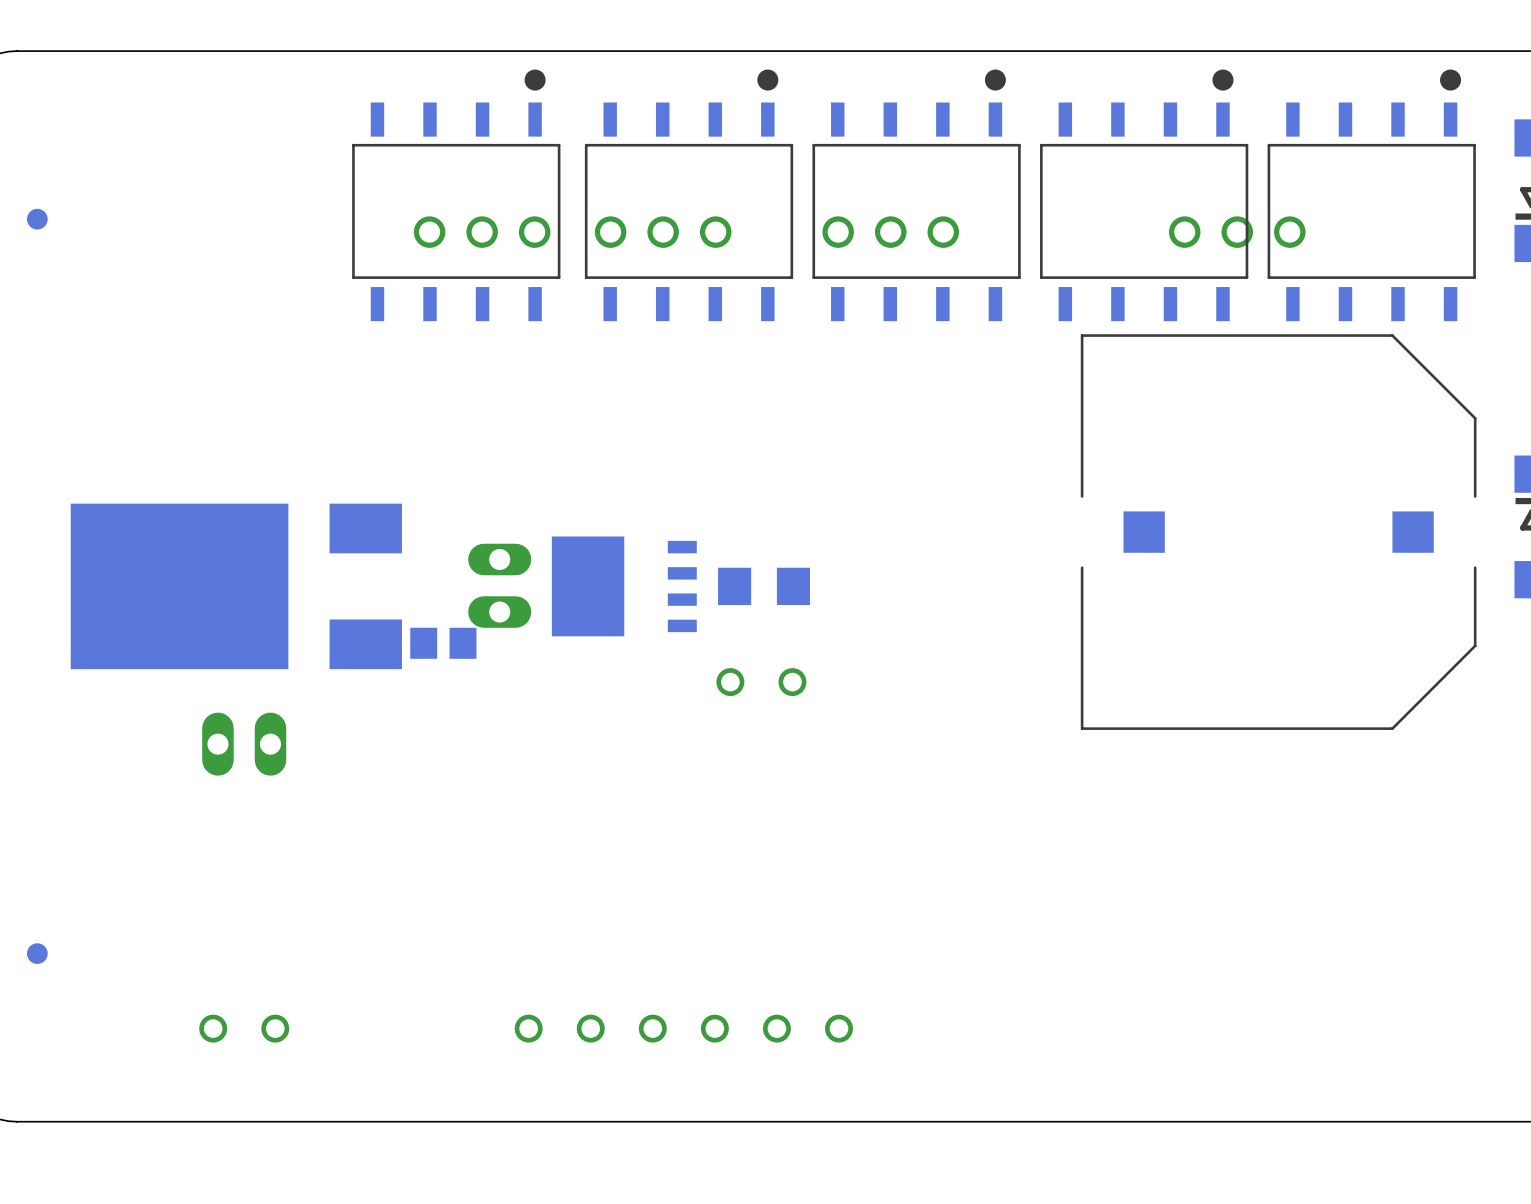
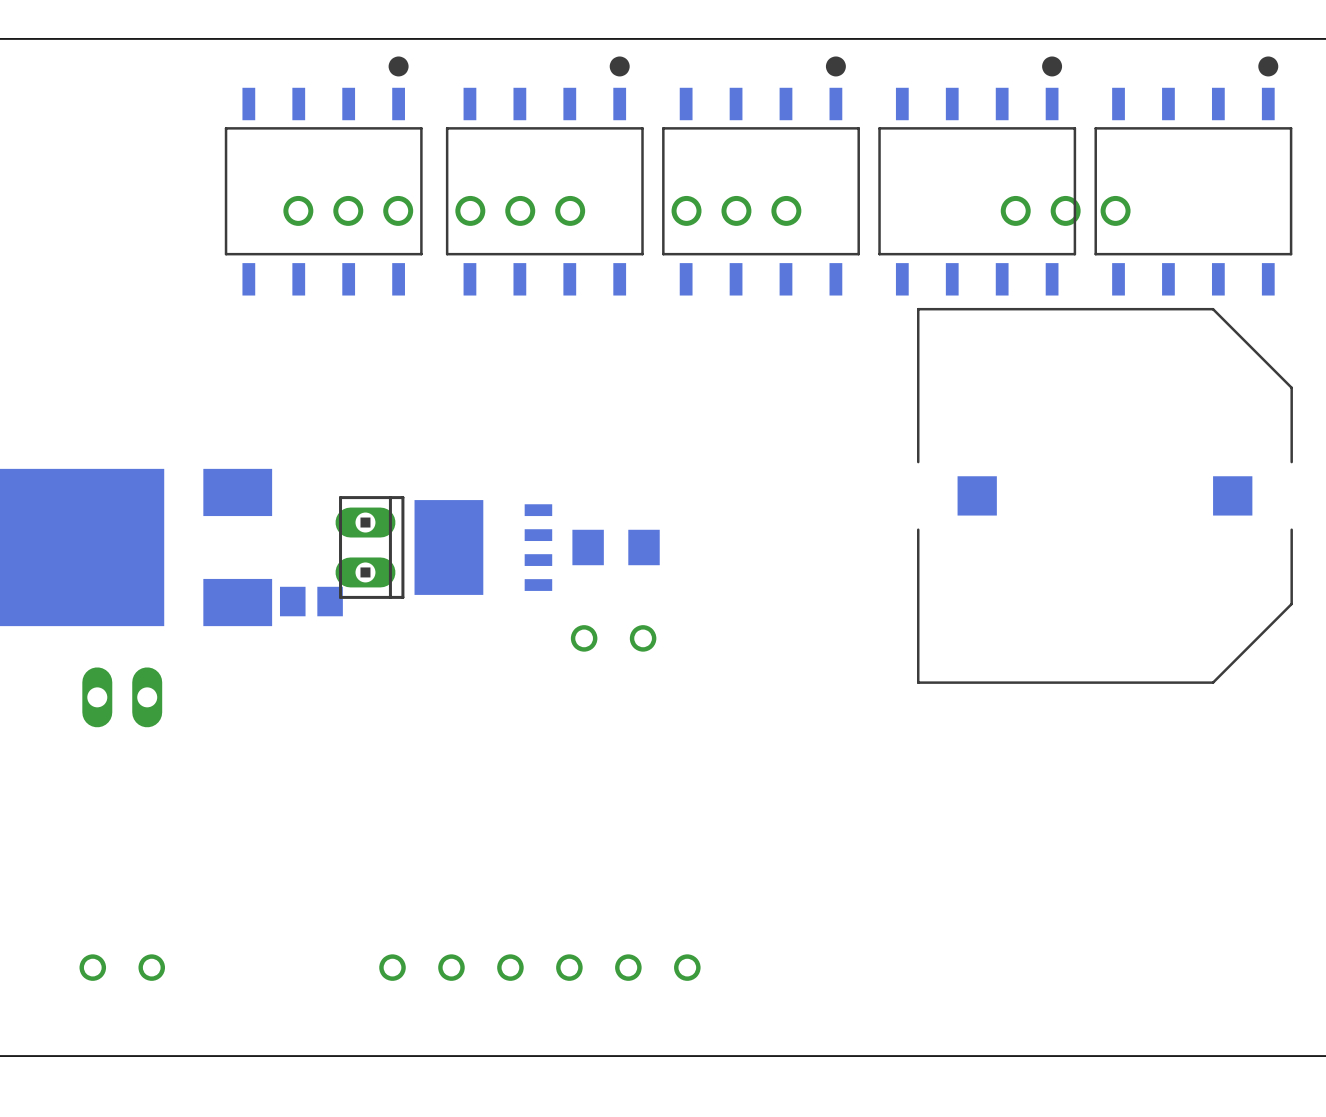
part side: top (499, 585) -> bottom (369, 547)

